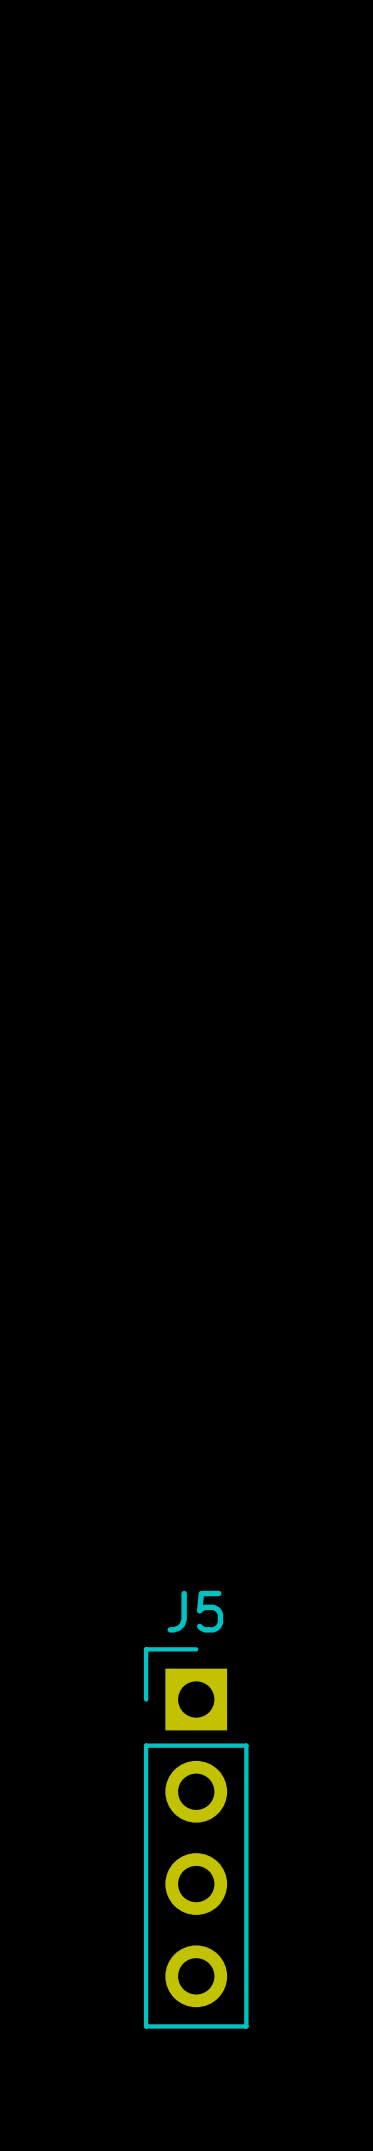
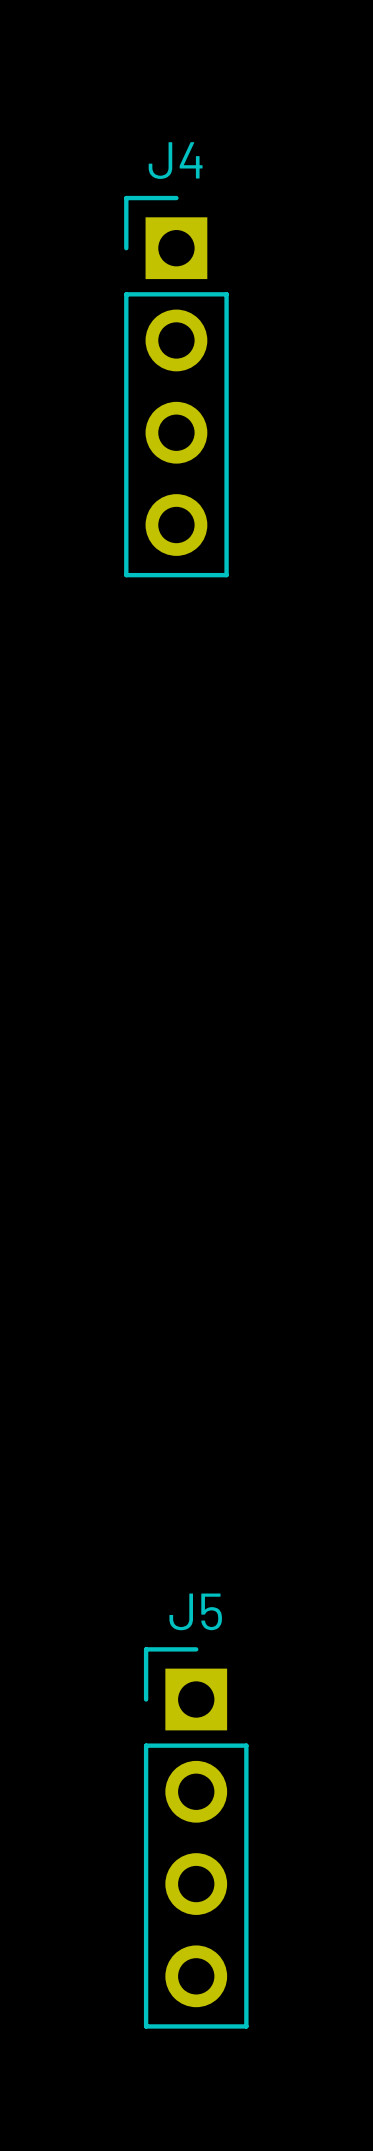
J4: none -> (176, 386)

